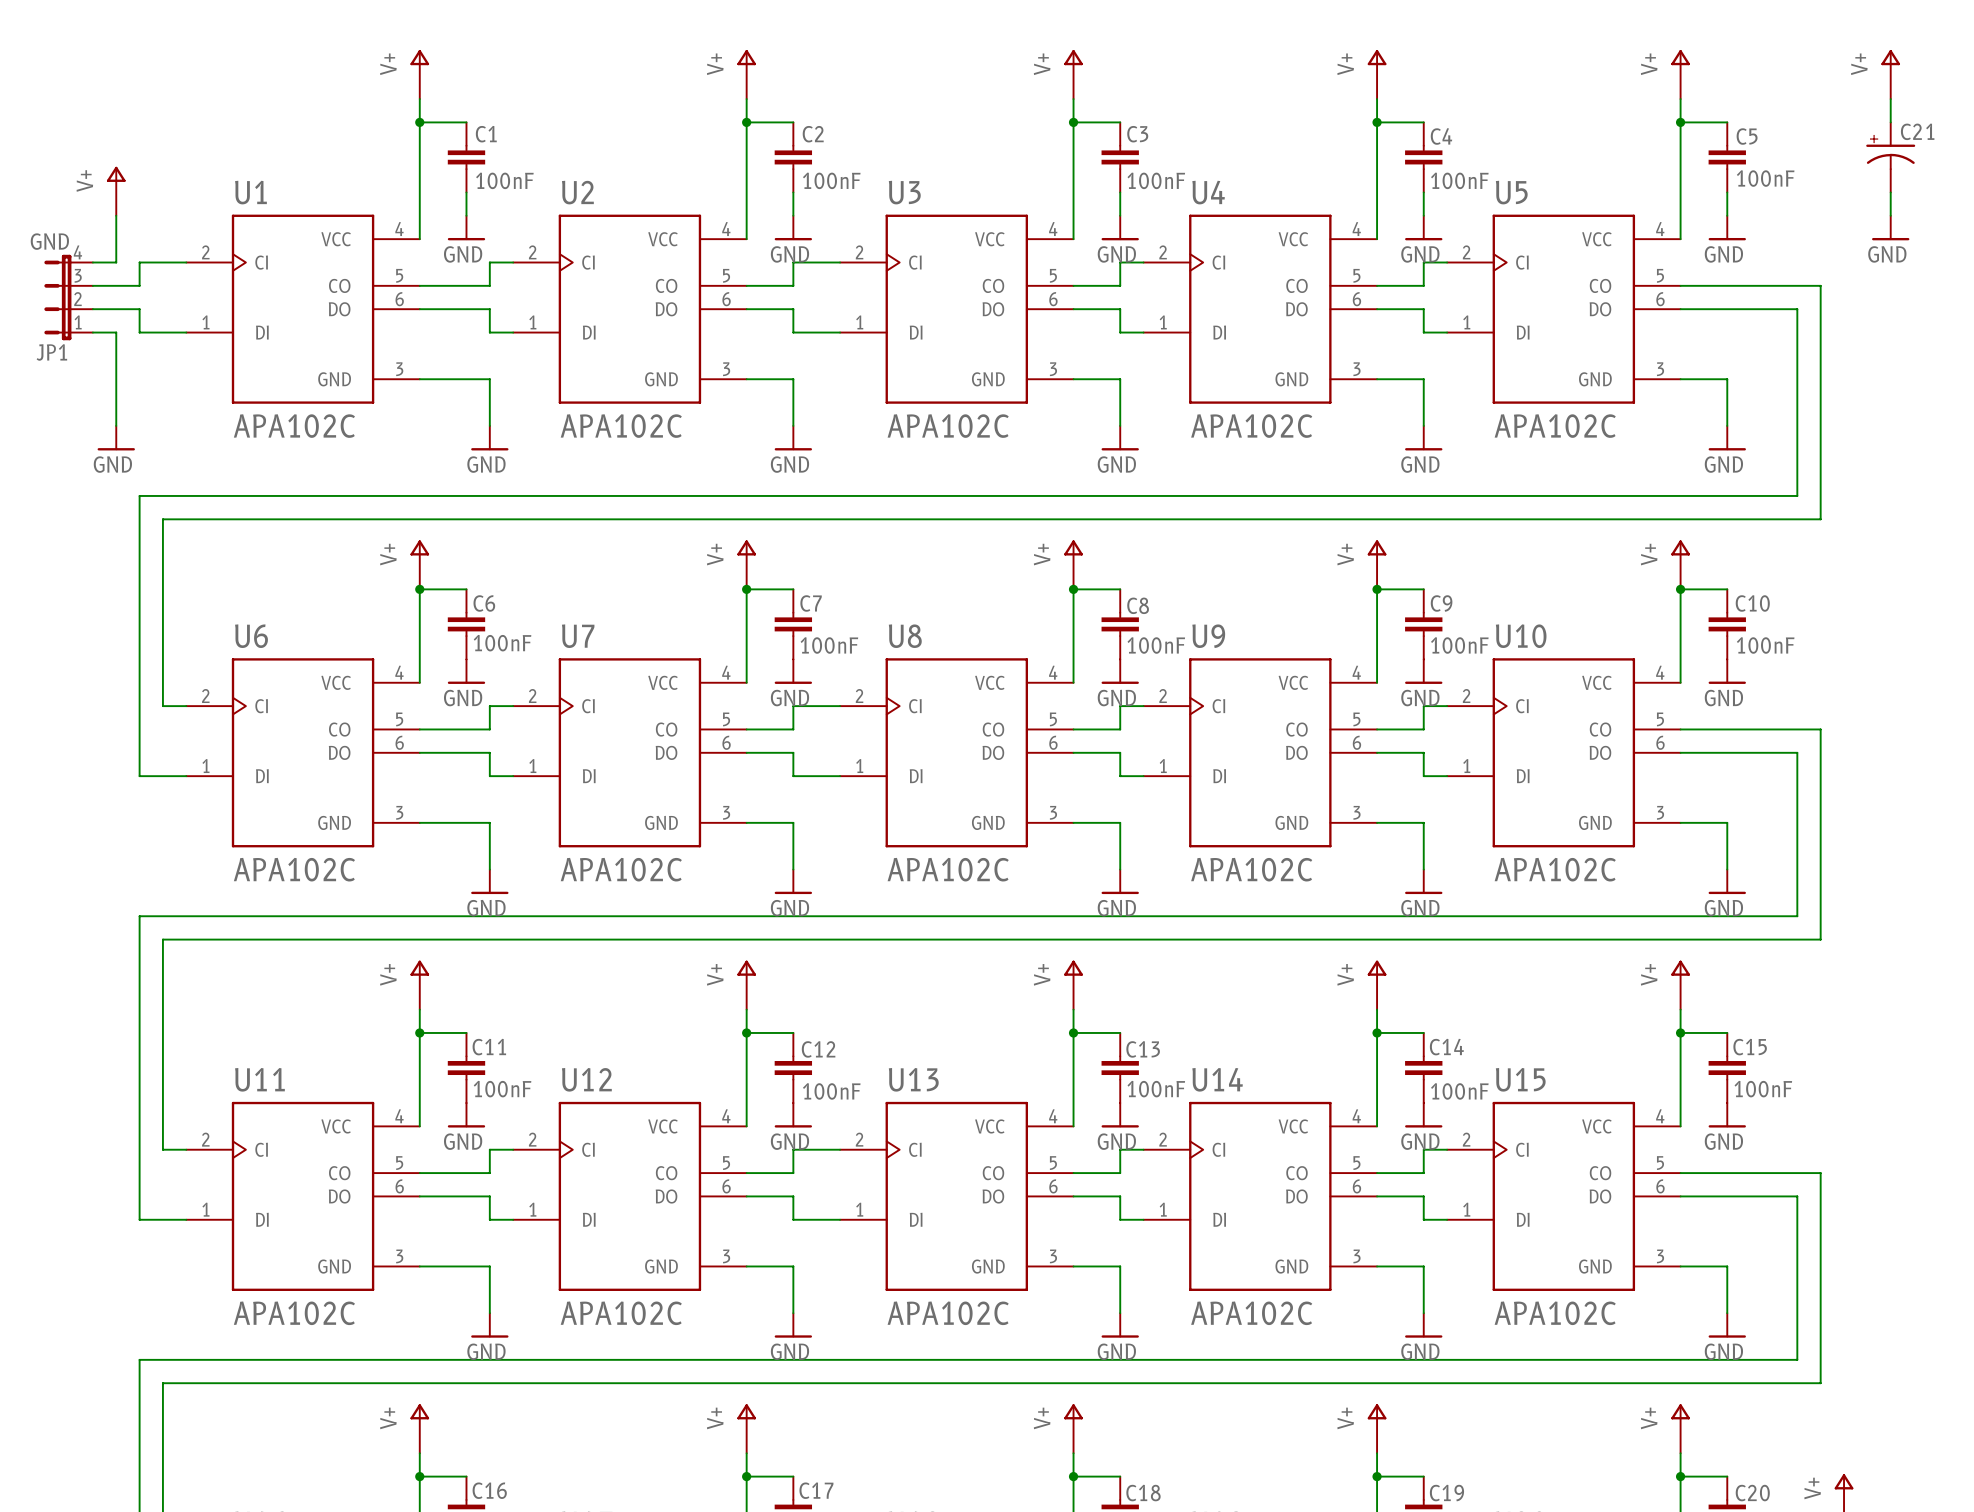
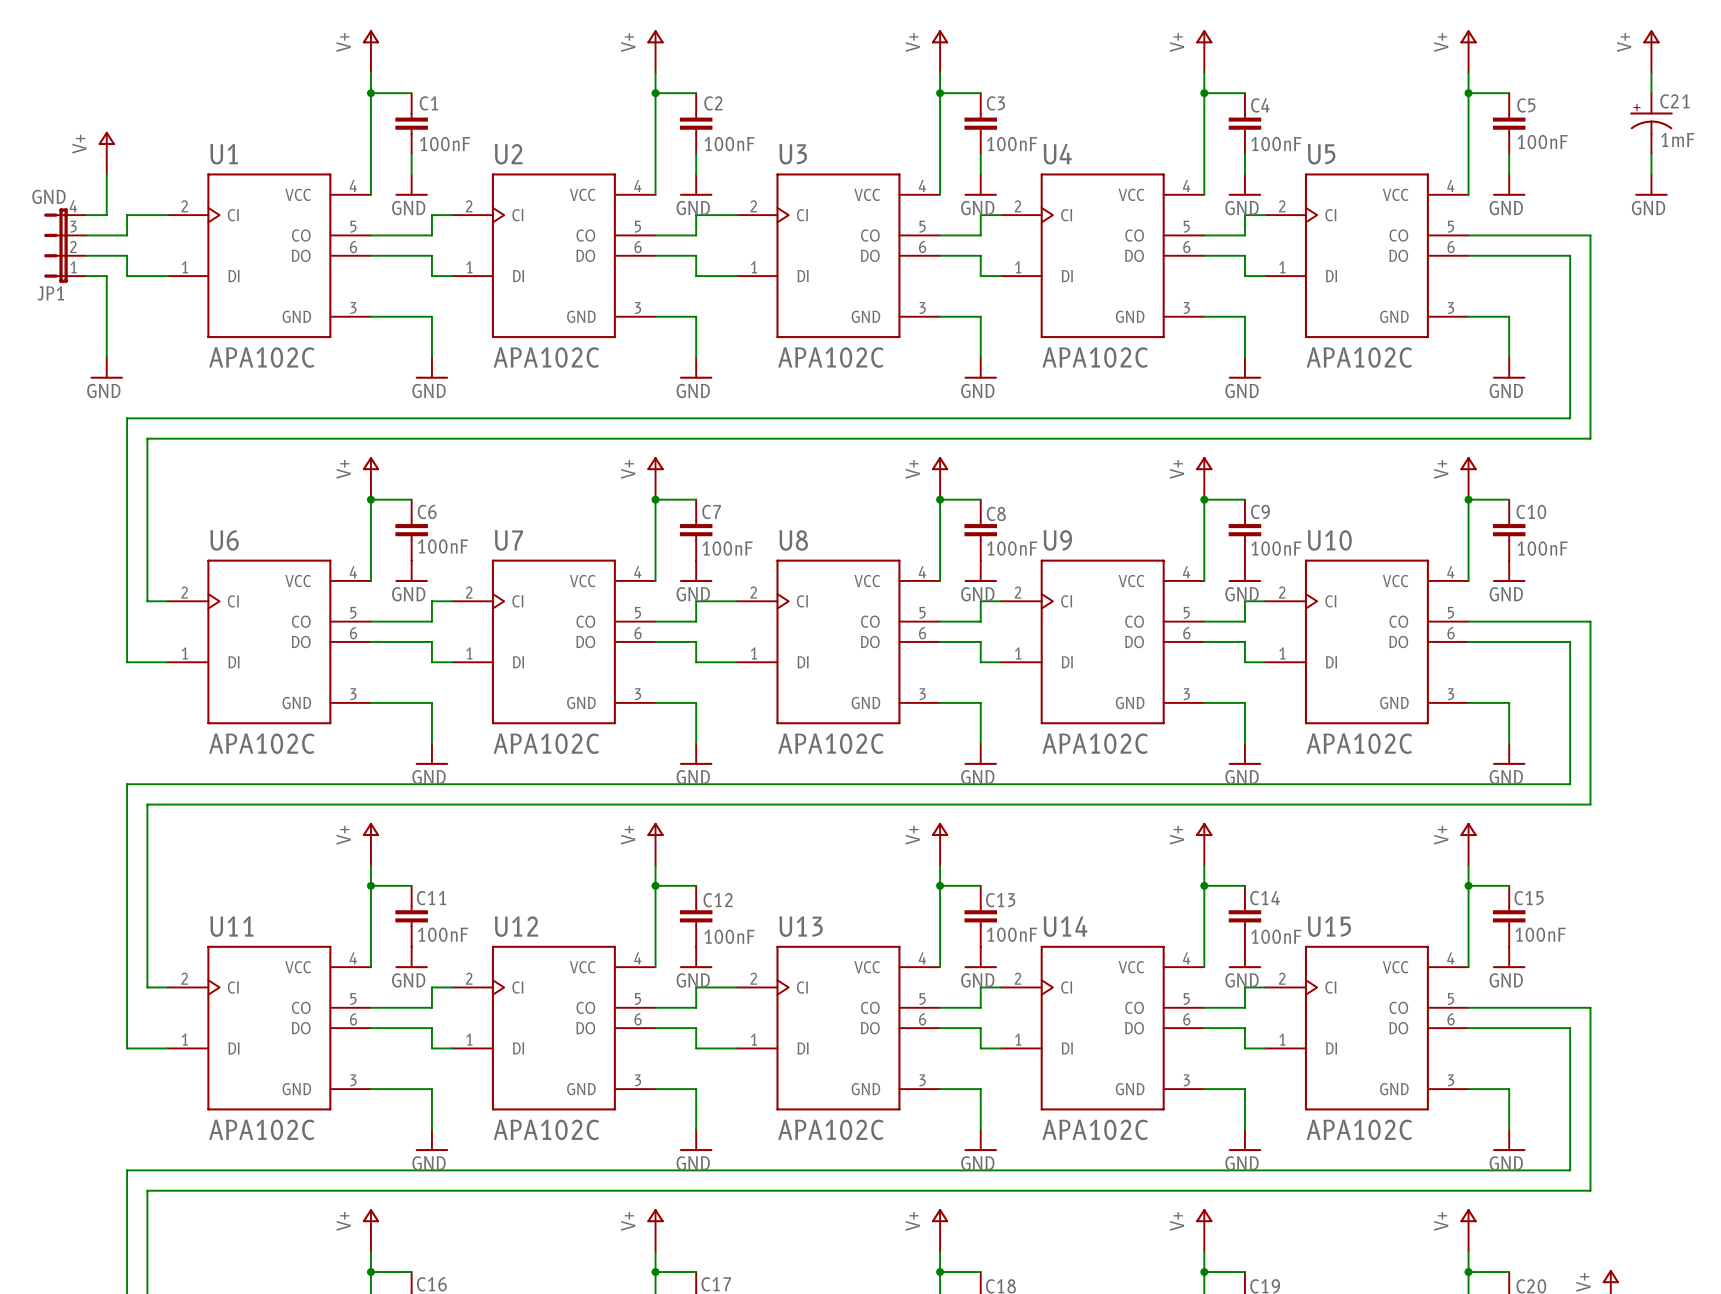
C21 value: none -> 1mF (1677, 139)

